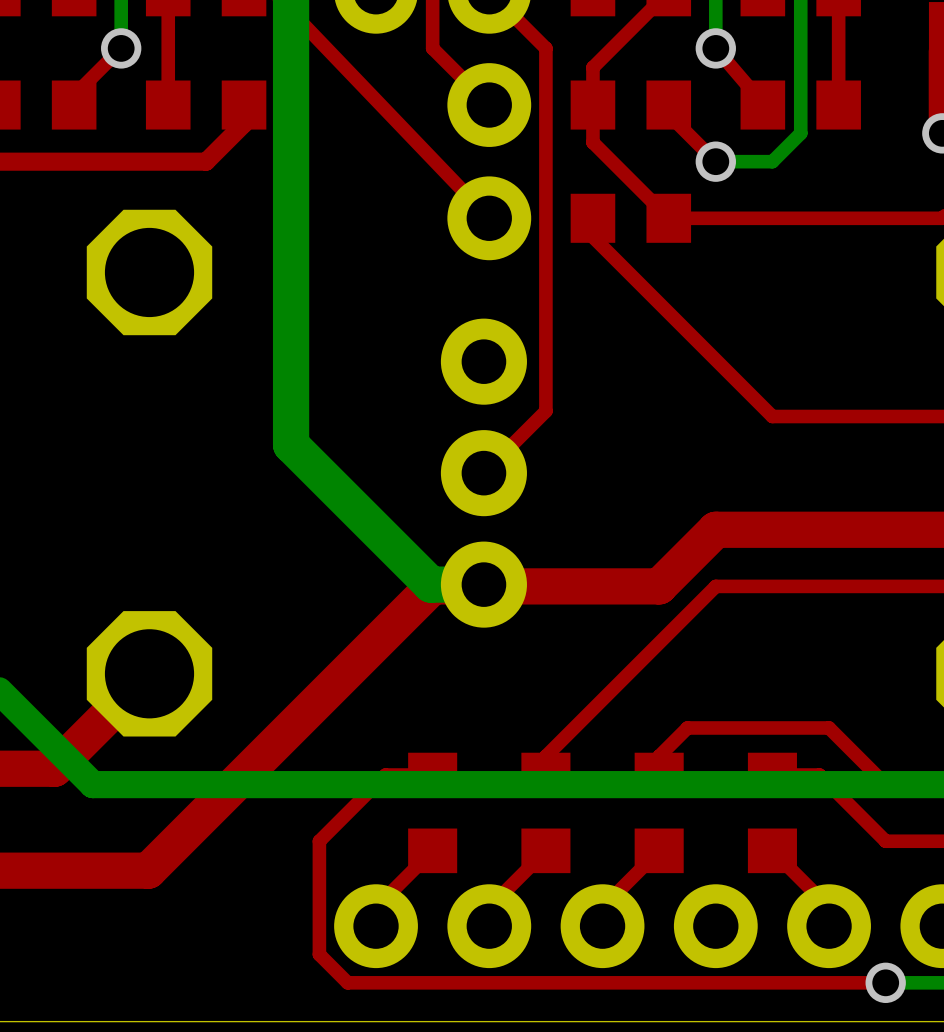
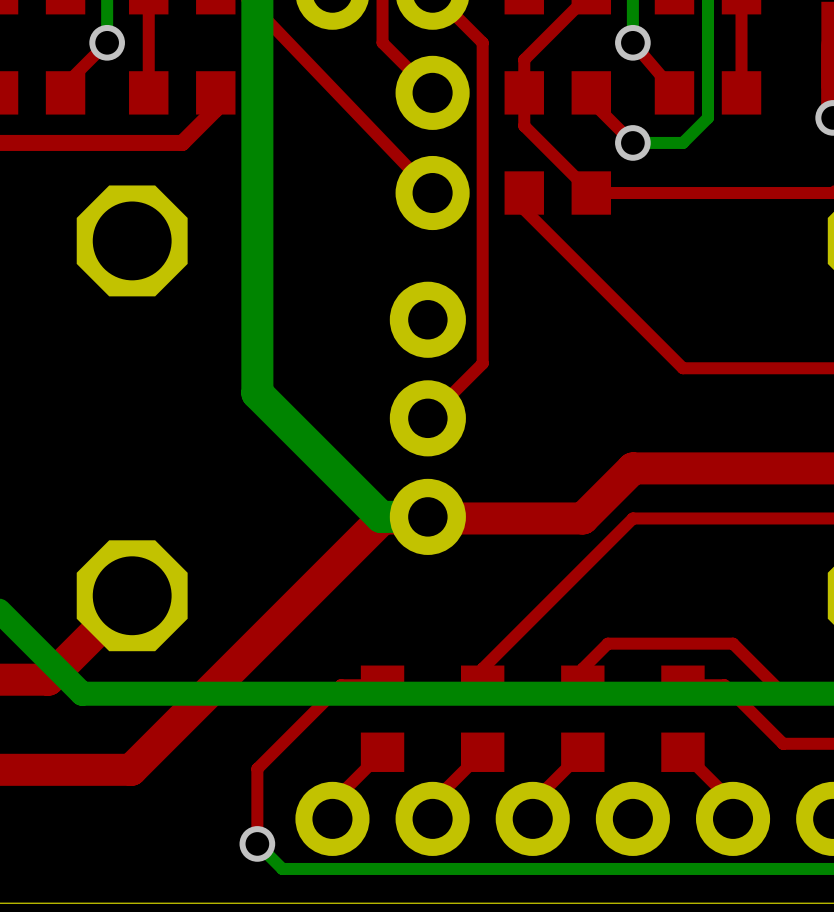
top track: (319, 841) (319, 954) (347, 982) (885, 982) -> (282, 743) (257, 768) (257, 843)
bottom track: none -> (257, 843) (282, 868) (783, 868)
via: none -> (257, 843)
via: (885, 982) -> none

